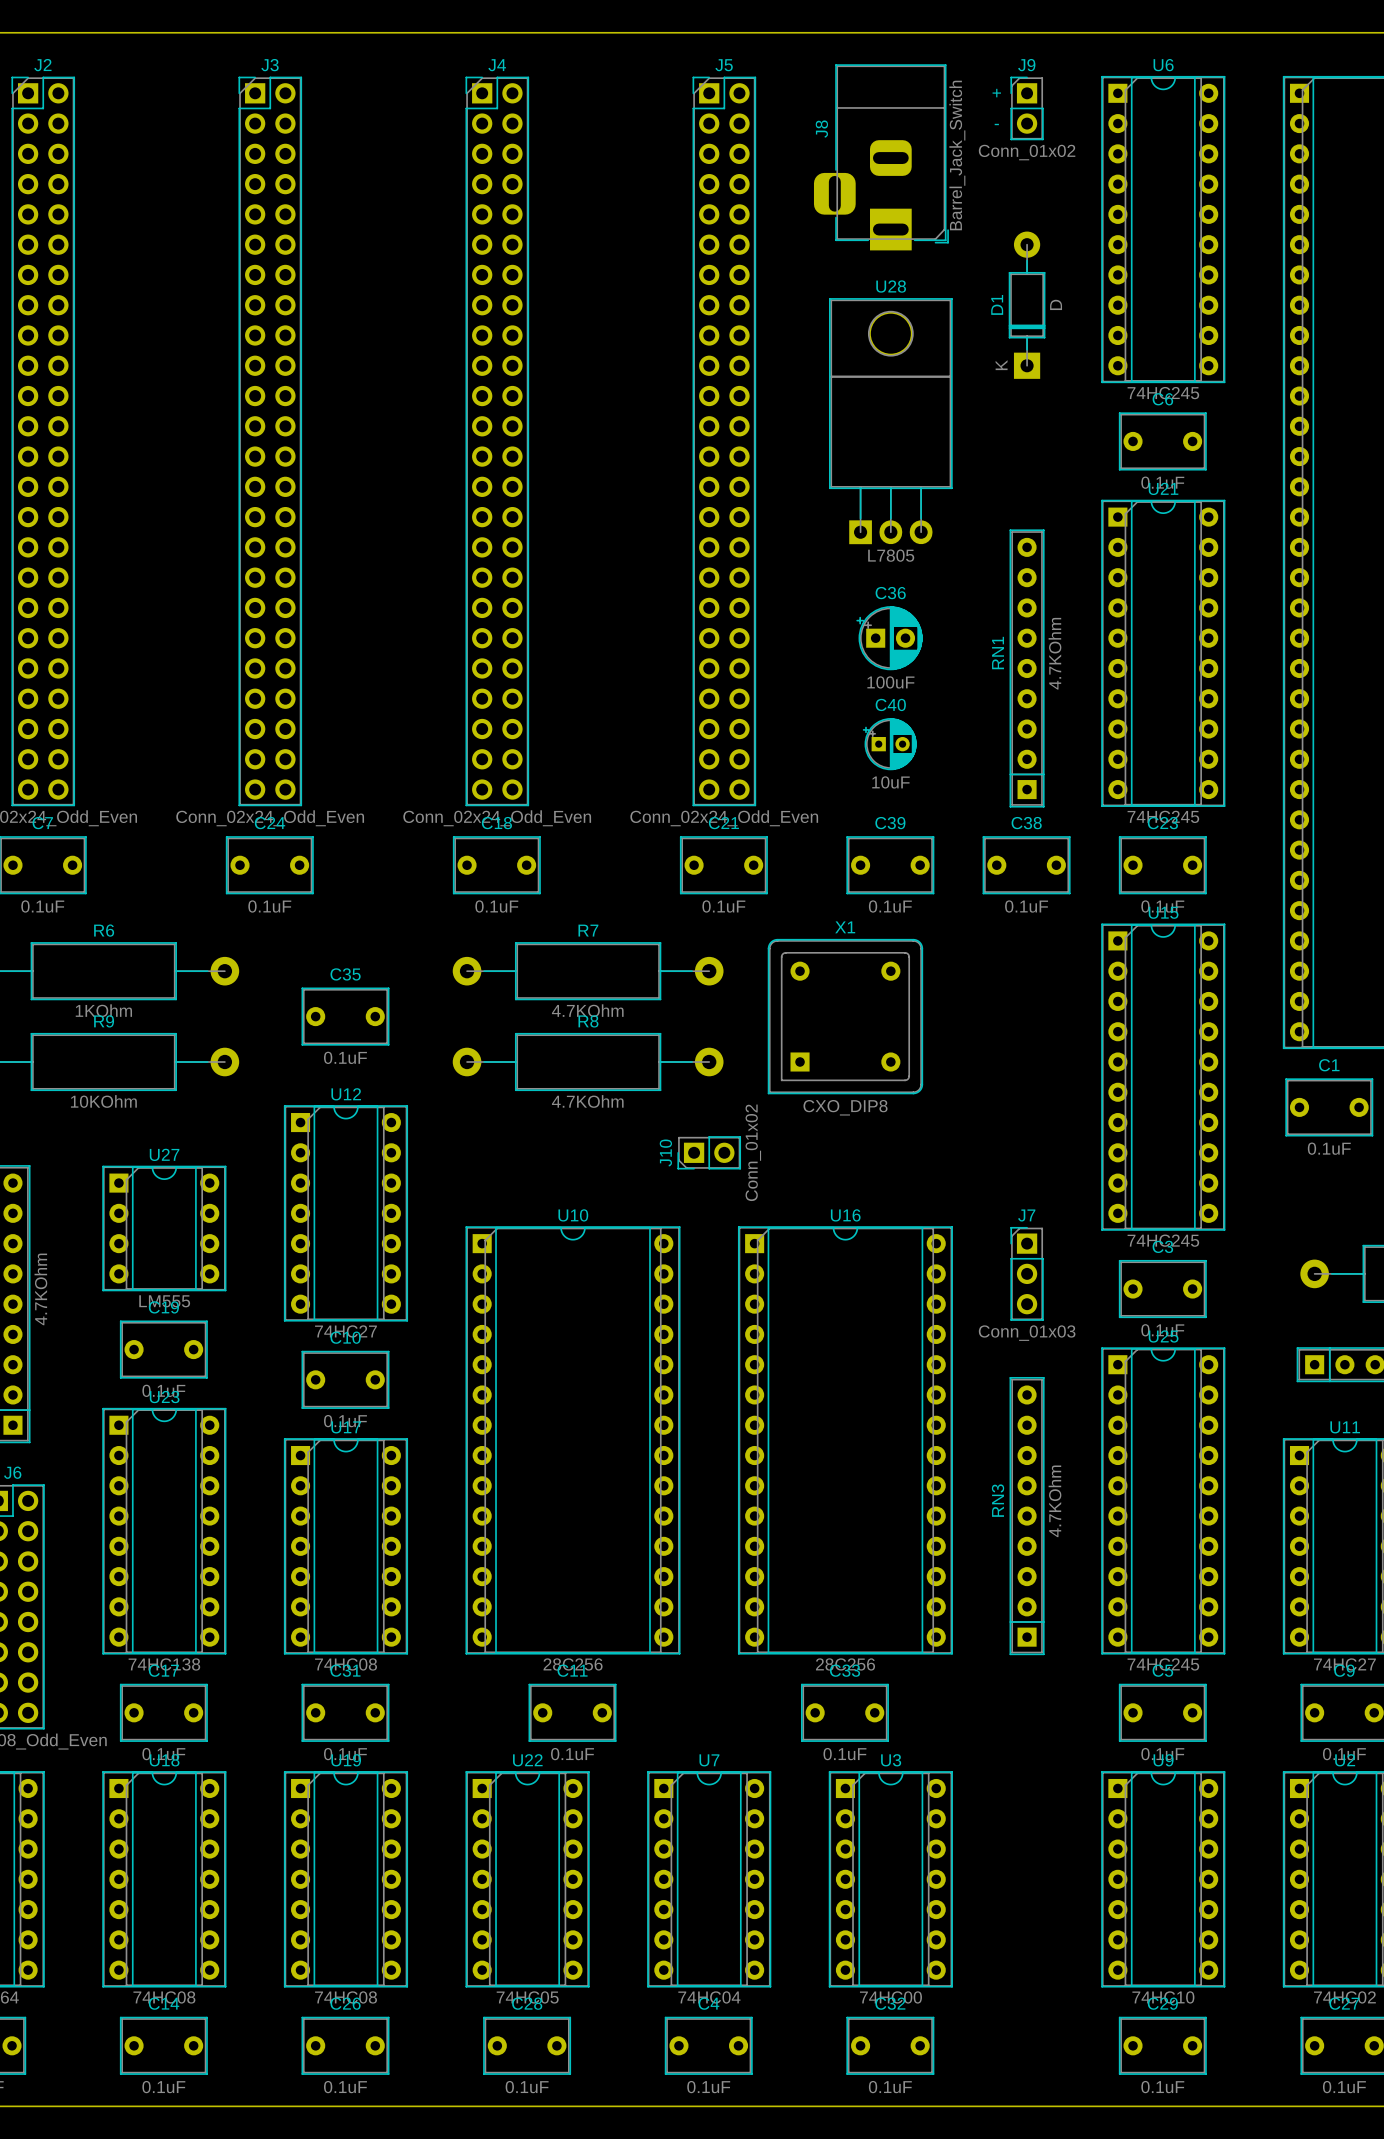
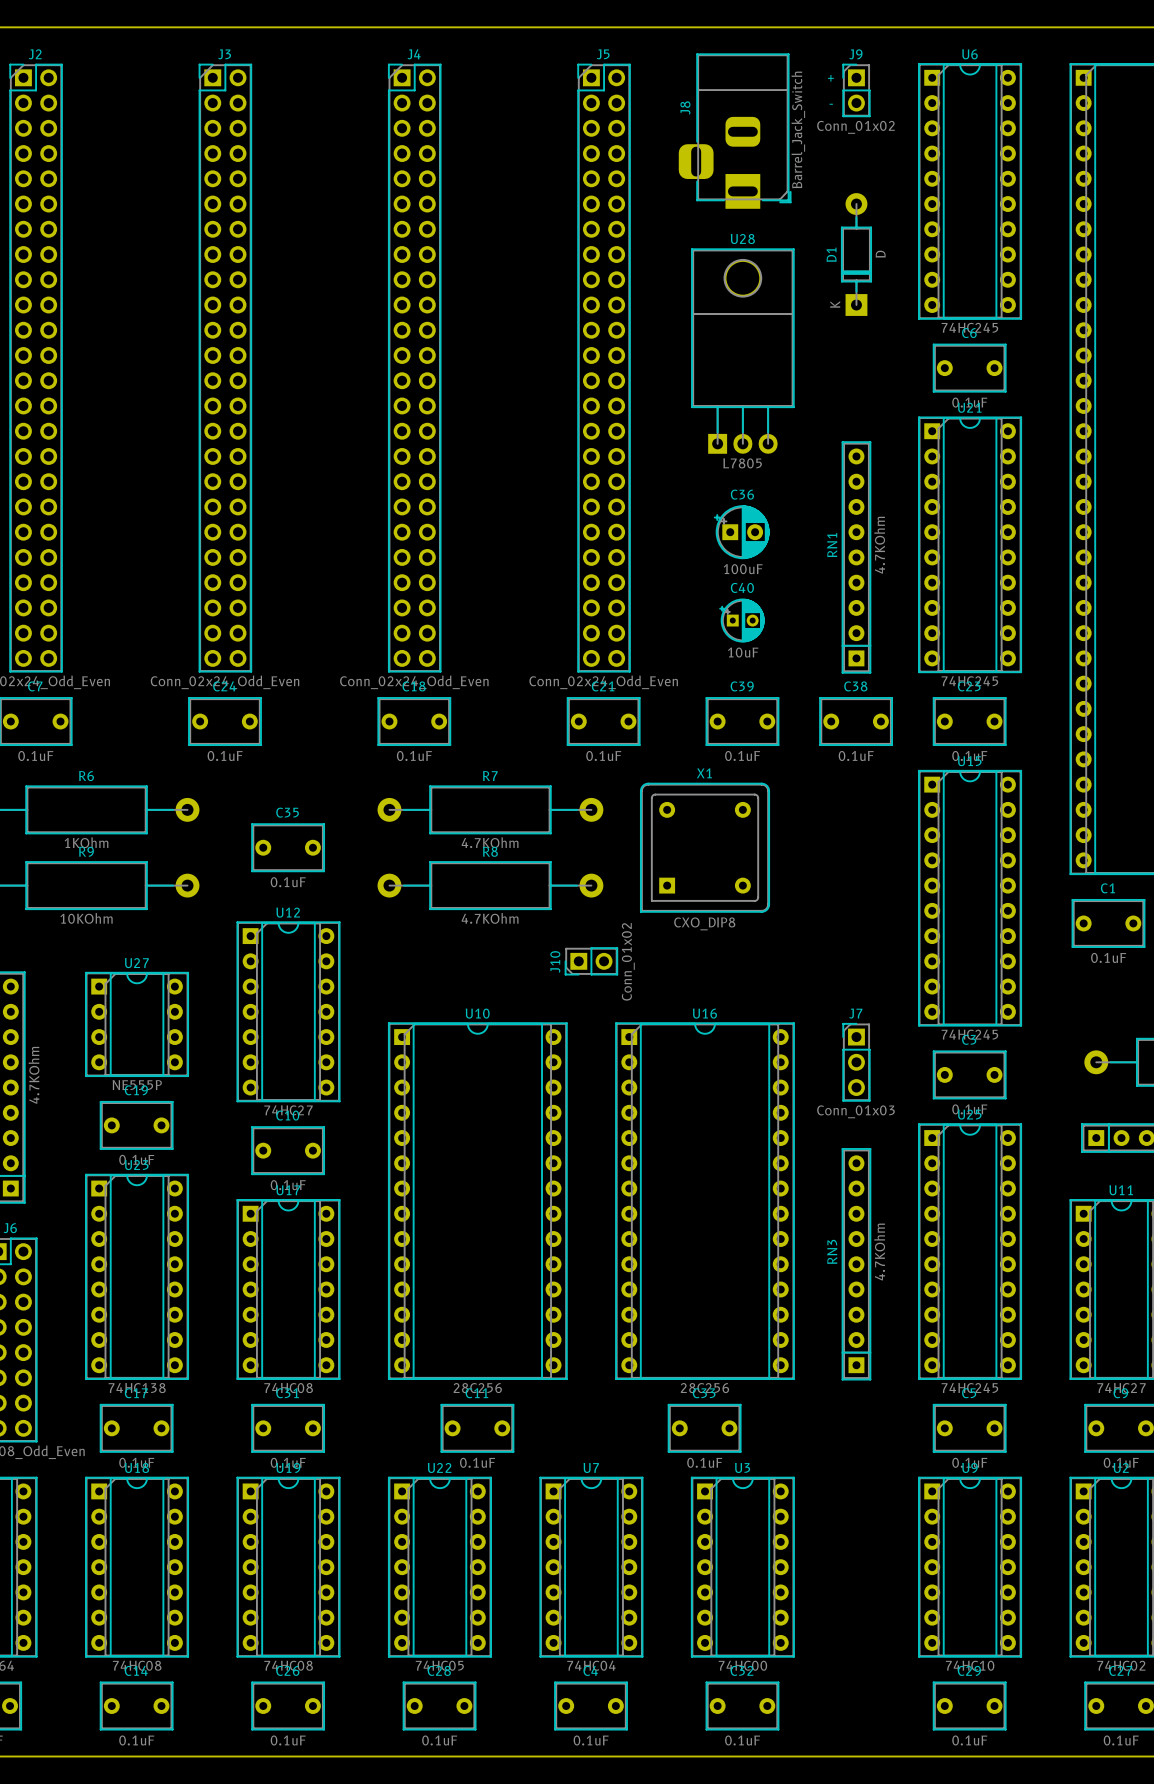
U27 value: LM555 (164, 1301) -> NE555P (137, 1085)

